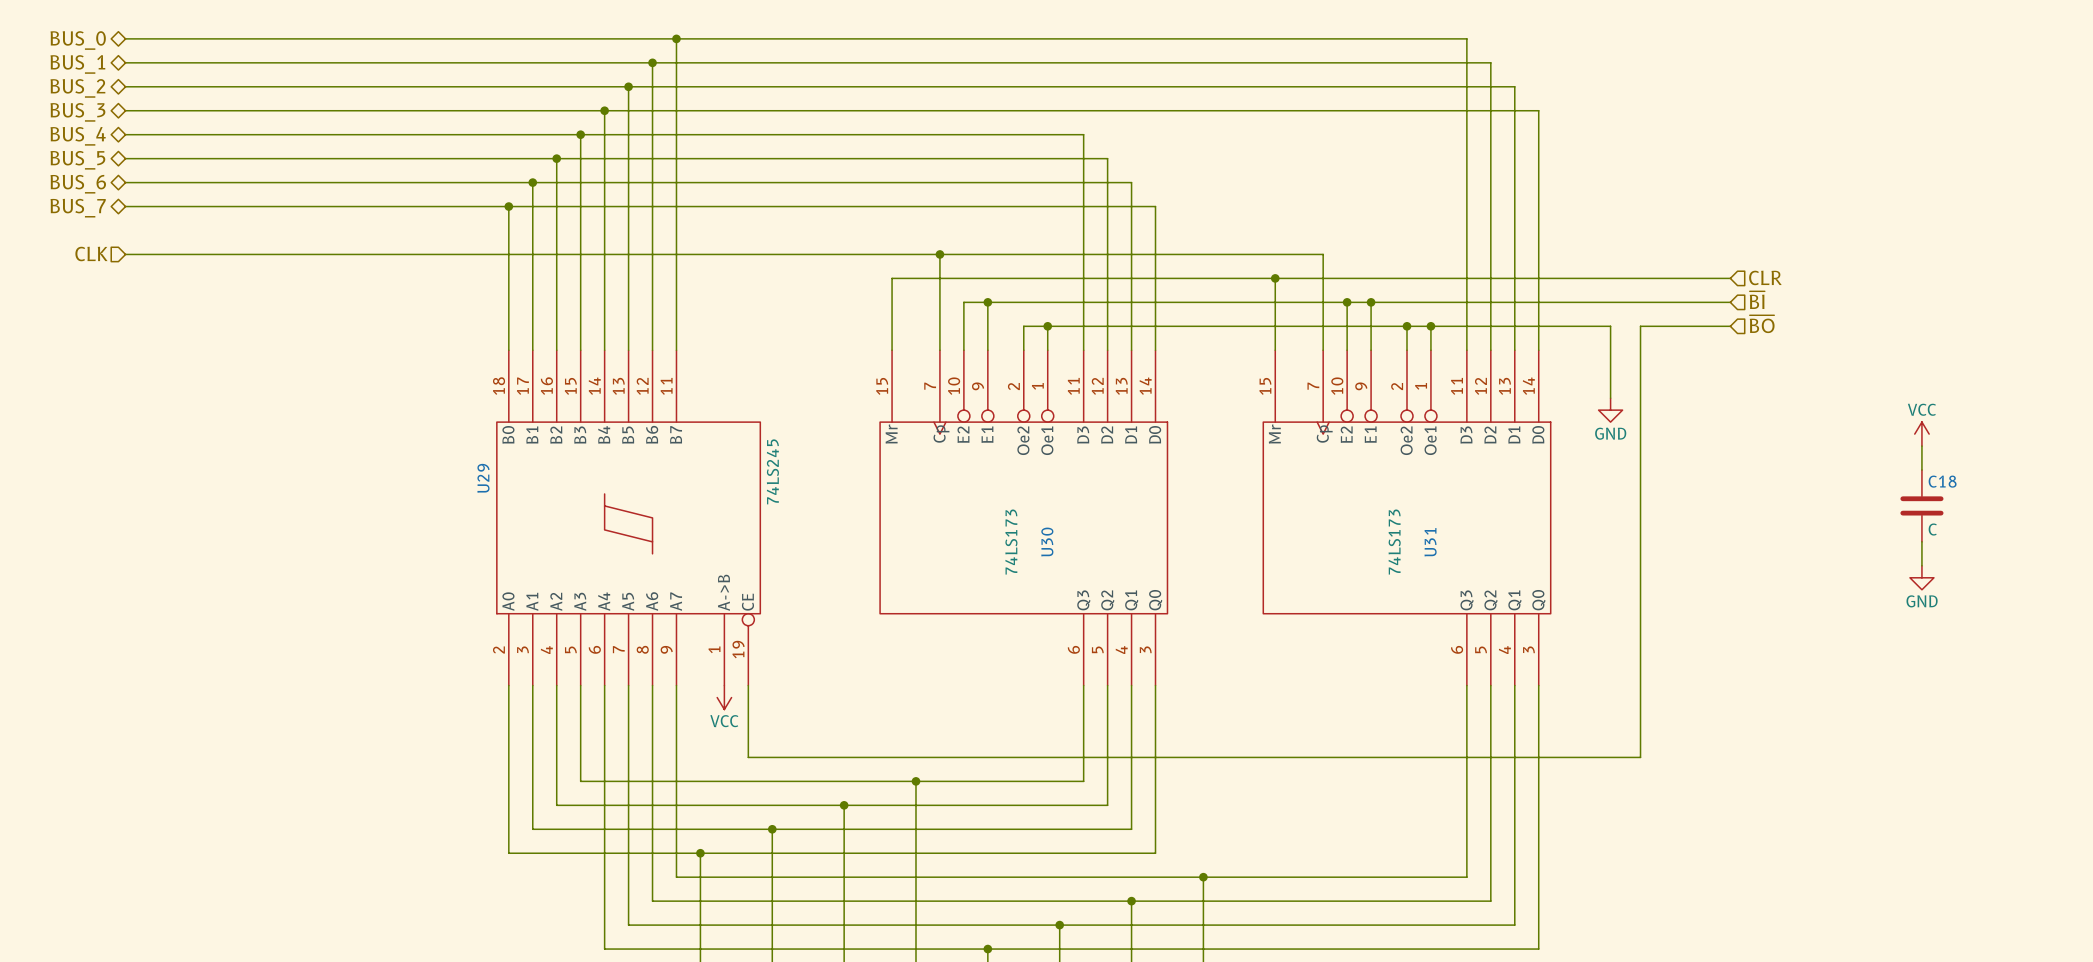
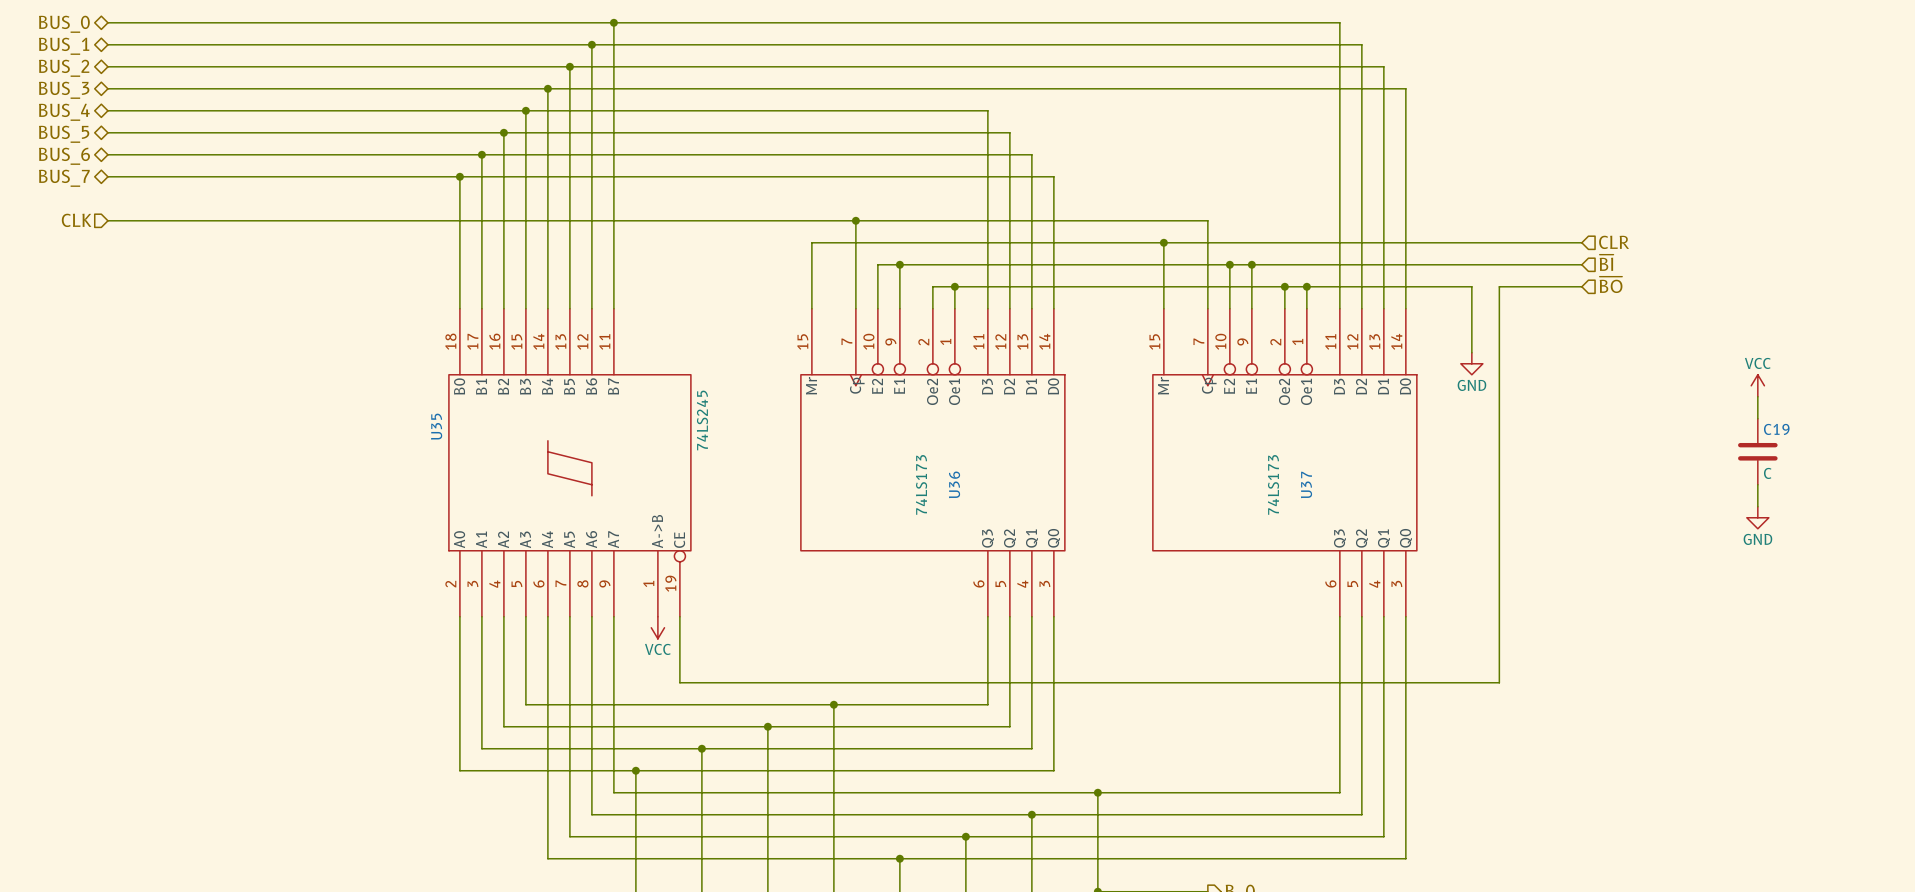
U29 name: U29 (483, 478) -> U35 (436, 426)
C18 name: C18 (1942, 481) -> C19 (1776, 429)
U30 name: U30 (1047, 542) -> U36 (954, 484)
U31 name: U31 (1430, 542) -> U37 (1306, 484)

